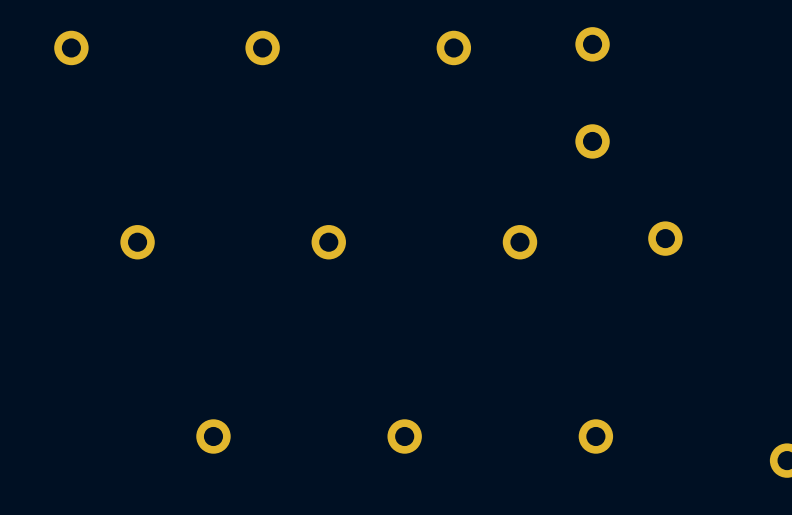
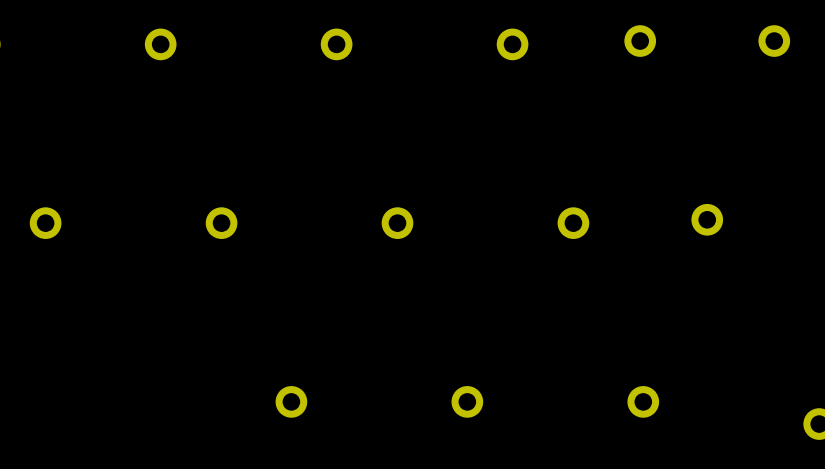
part position: (592, 141) -> (774, 41)

